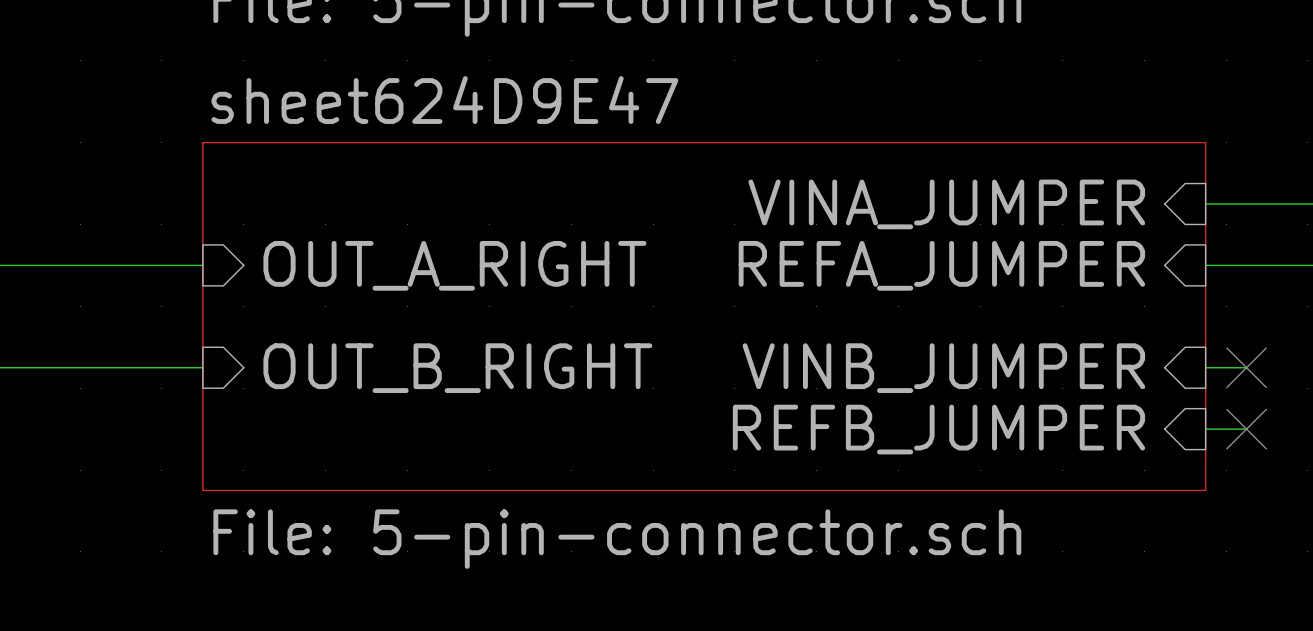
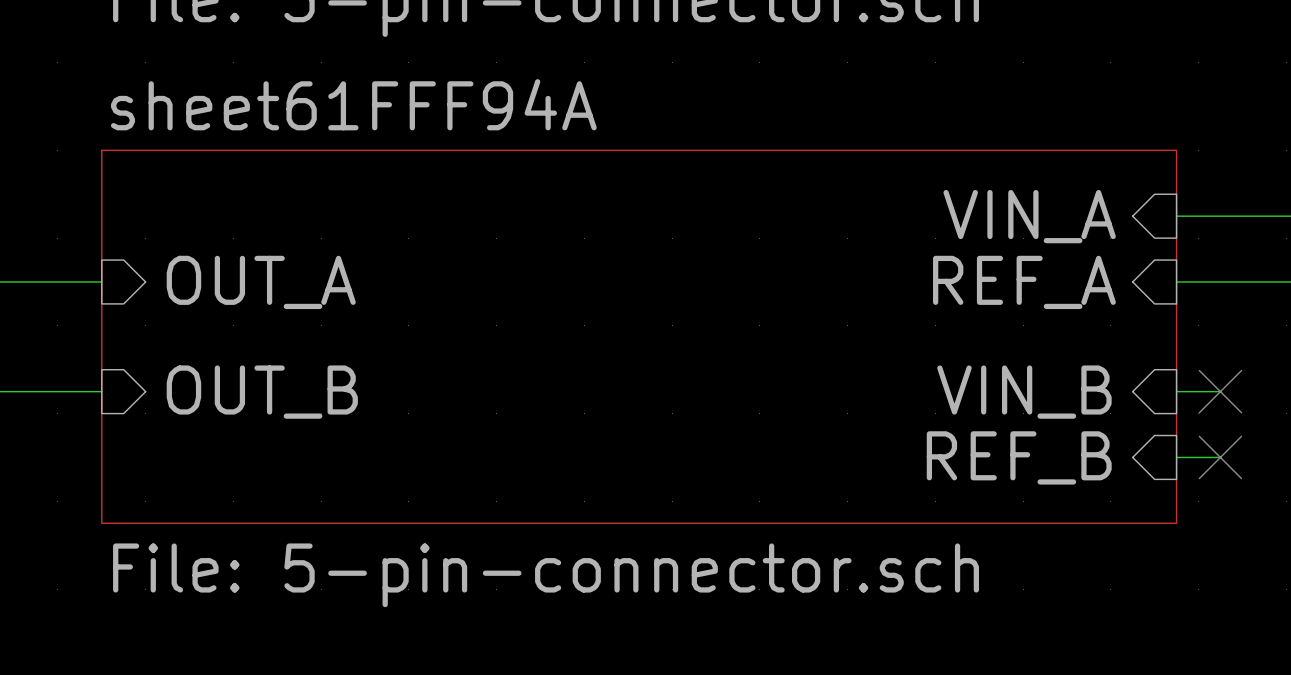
sheet sheet624D9E47 name: sheet624D9E47 (444, 100) -> sheet61FFF94A (353, 104)
sheet pin: VINA_JUMPER (946, 204) -> VIN_A (1029, 216)
sheet pin: OUT_A_RIGHT (454, 265) -> OUT_A (261, 282)
sheet pin: REFA_JUMPER (941, 265) -> REF_A (1024, 282)
sheet pin: OUT_B_RIGHT (457, 368) -> OUT_B (262, 392)
sheet pin: VINB_JUMPER (943, 368) -> VIN_B (1024, 392)
sheet pin: REFB_JUMPER (938, 429) -> REF_B (1019, 457)

